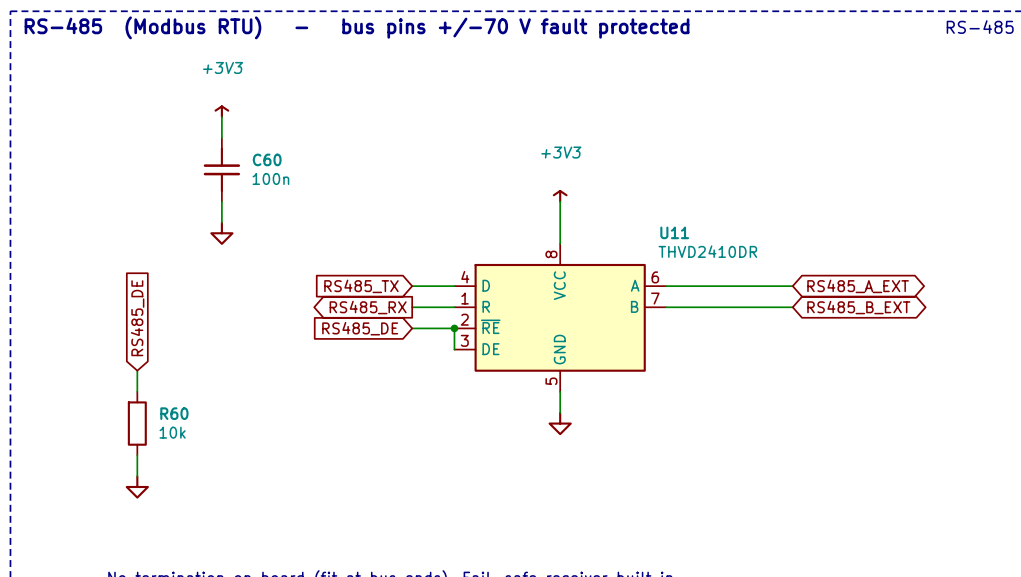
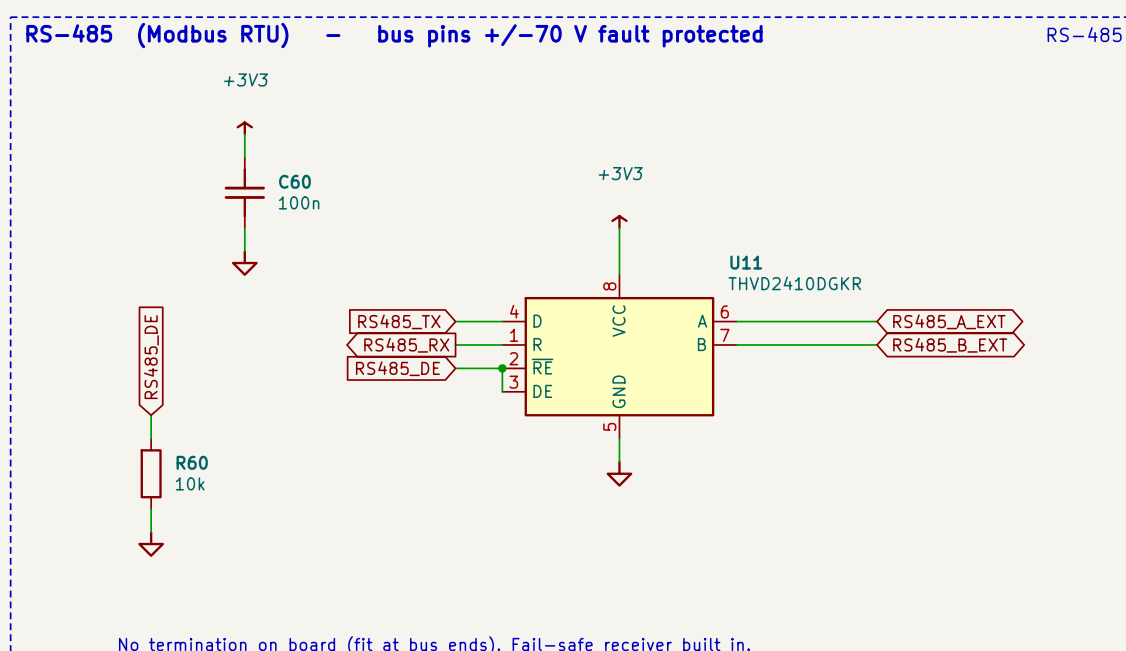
U11 value: THVD2410DR (707, 251) -> THVD2410DGKR (794, 283)

